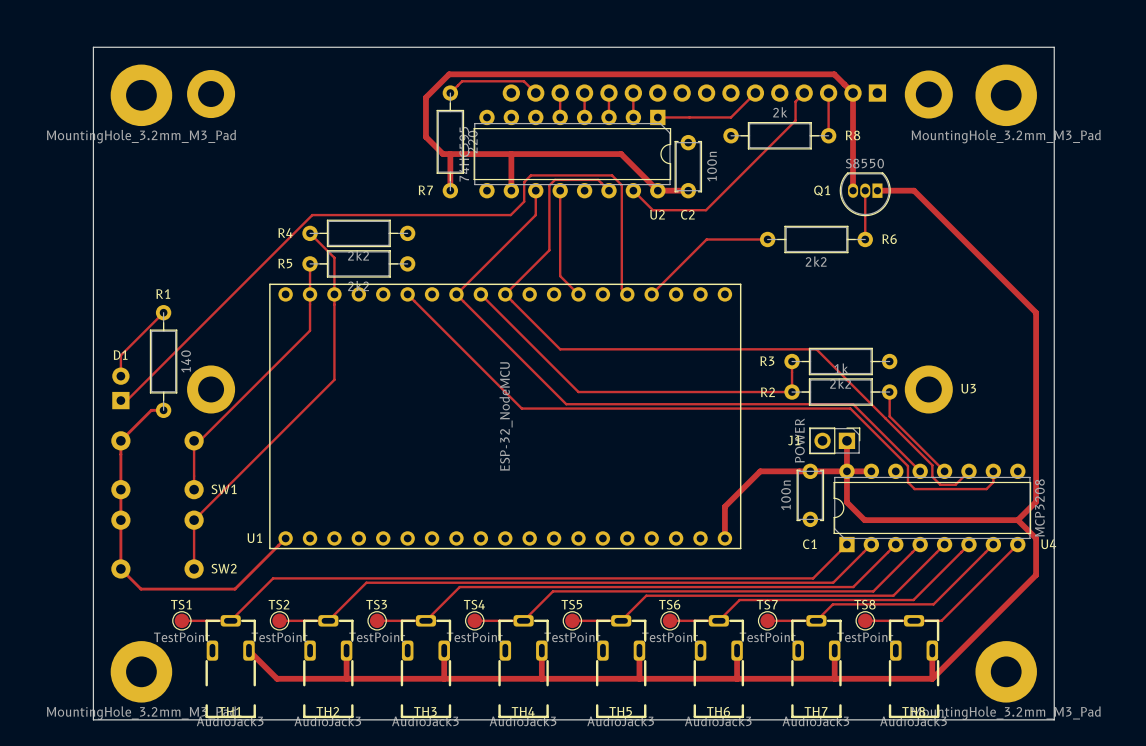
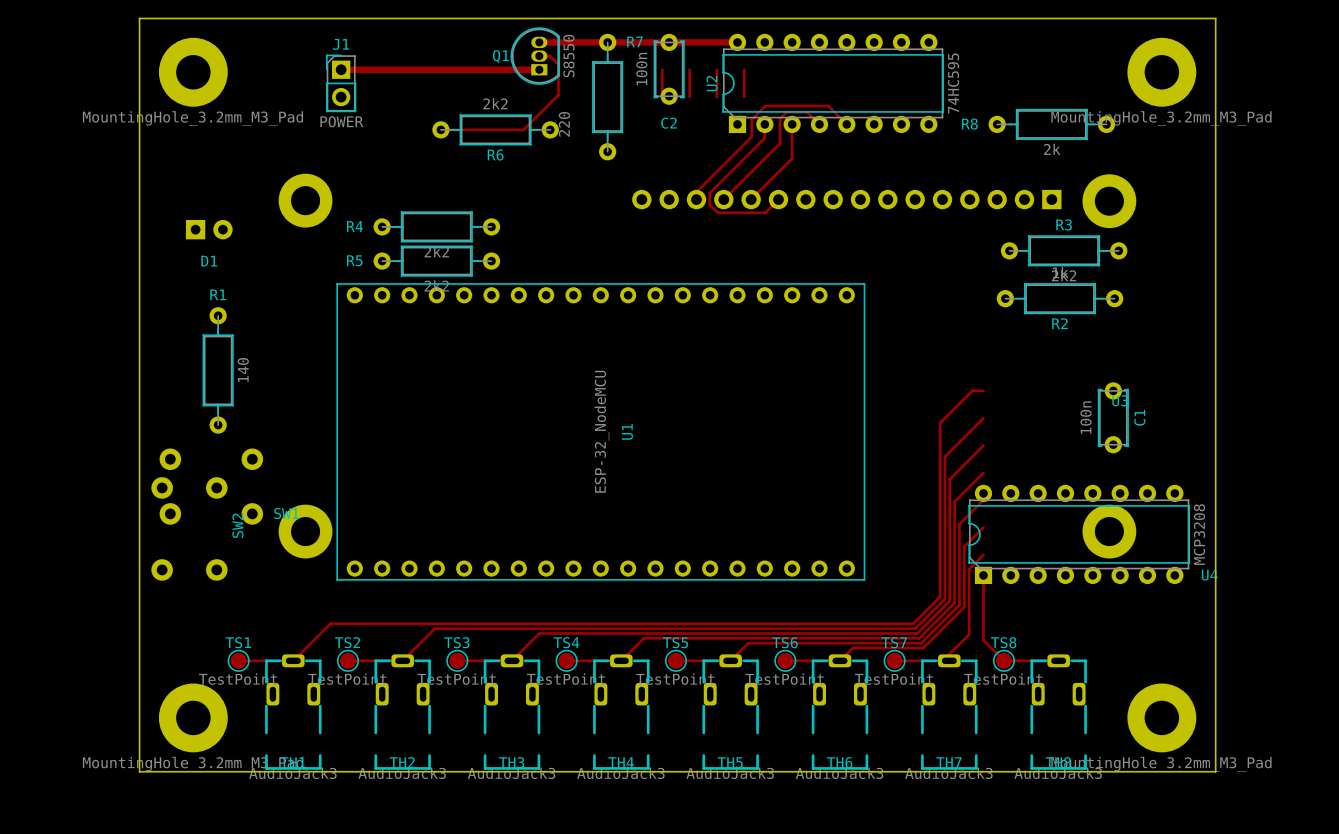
track: none -> (539, 42) (737, 42)
track: none -> (539, 56) (550, 56) (558, 64) (558, 95) (523, 129) (440, 129)
track: (450, 93) (462, 81) (523, 81) (535, 93) -> (539, 69) (341, 69)
track: (755, 93) (730, 117) (657, 117) -> none
track: (804, 93) (795, 101) (795, 120) (706, 210) (652, 210) (633, 190) -> none
track: (828, 93) (828, 135) -> none
R8 value position: 2k (780, 112) -> 2k (1052, 149)
R8 position: (779, 135) -> (1051, 124)
R8 name position: R8 (853, 135) -> R8 (969, 124)
R7 position: (450, 141) -> (607, 97)
track: none -> (764, 124) (764, 138) (709, 193) (709, 204) (717, 212) (765, 212) (778, 199)
track: none -> (792, 124) (792, 158) (751, 199)
track: none -> (819, 124) (807, 112) (786, 112) (780, 118) (780, 143) (723, 199)
track: none -> (846, 124) (828, 105) (765, 105) (751, 119) (751, 136) (696, 192) (696, 199)
track: (450, 154) (450, 190) -> none
track: (511, 154) (511, 190) -> none
U2 rotation: 0° (572, 154) -> 180° (833, 83)
U2 position: (572, 154) -> (833, 83)
C2 position: (688, 166) -> (669, 69)
C2 value position: 100n (712, 166) -> 100n (641, 69)
R7 name position: R7 (425, 190) -> R7 (634, 42)
track: (535, 190) (535, 215) (456, 294) (566, 404) (853, 404) (920, 471) -> none
track: (560, 190) (560, 276) (578, 294) -> none
track: (608, 190) (598, 179) (555, 179) (549, 185) (549, 250) (505, 294) (560, 349) (816, 349) (932, 465) (932, 476) (940, 484) (955, 484) (968, 471) -> none
track: (688, 190) (657, 190) (621, 154) (443, 154) (425, 136) (425, 97) (449, 74) (834, 74) (853, 93) (853, 190) -> none
track: (865, 190) (865, 239) -> none
track: (877, 190) (914, 190) (1036, 312) (1036, 501) (1017, 520) -> none
Q1 rotation: 0° (865, 194) -> 90° clockwise (535, 56)
Q1 position: (865, 194) -> (535, 56)
U2 name position: U2 (657, 214) -> U2 (712, 83)
track: (310, 233) (334, 257) (334, 379) (194, 520) (194, 568) -> none
track: (767, 239) (706, 239) (651, 294) -> none
R6 position: (816, 239) -> (495, 129)
R6 name position: R6 (889, 239) -> R6 (495, 154)
U3 position: (569, 241) -> (707, 366)
R6 value position: 2k2 (816, 261) -> 2k2 (495, 103)
track: (310, 263) (310, 330) (199, 440) (194, 440) (194, 489) -> none
track: (407, 294) (521, 408) (850, 408) (907, 466) (907, 482) (914, 489) (986, 489) (993, 482) (993, 471) -> none
track: (480, 294) (578, 392) (792, 392) (792, 361) -> none
track: (627, 294) (621, 288) (621, 185) (612, 175) (530, 175) (524, 182) (524, 201) (510, 215) (312, 215) (126, 400) (120, 400) -> none
track: (163, 312) (120, 355) (120, 376) -> none
D1 name position: D1 (120, 355) -> D1 (209, 261)
R3 name position: R3 (767, 361) -> R3 (1064, 224)
R3 position: (840, 361) -> (1064, 250)
D1 rotation: 0° (120, 388) -> 90° clockwise (209, 229)
D1 position: (120, 388) -> (209, 229)
R2 name position: R2 (767, 392) -> R2 (1059, 323)
R2 position: (840, 392) -> (1060, 298)
track: (889, 392) (889, 416) (944, 471) -> none
track: (163, 410) (151, 410) (120, 440) (120, 568) (141, 589) (234, 589) (285, 538) -> none
J1 name position: J1 (794, 440) -> J1 (341, 44)
J1 rotation: 0° (834, 440) -> 90° counterclockwise (341, 83)
J1 position: (834, 440) -> (341, 83)
track: (846, 440) (846, 502) (864, 520) (1017, 520) -> none
track: (871, 471) (760, 471) (724, 506) (724, 538) -> none
C1 position: (810, 495) -> (1113, 417)
track: (1017, 520) (1036, 538) (1036, 575) (932, 678) -> none
U1 name rotation: 0° (254, 538) -> 90° counterclockwise (627, 431)
U1 name position: U1 (254, 538) -> U1 (627, 431)
SW2 rotation: 0° (157, 544) -> 90° clockwise (189, 528)
C1 name rotation: 0° (809, 544) -> 90° counterclockwise (1139, 417)
C1 name position: C1 (809, 544) -> C1 (1139, 417)
track: (846, 544) (813, 578) (273, 578) (263, 587) -> (983, 390) (972, 390) (940, 423) (940, 596) (913, 623) (330, 623)
track: (871, 544) (833, 582) (366, 582) (357, 592) -> (983, 418) (944, 456) (944, 598) (915, 628) (434, 628)
track: (895, 544) (853, 587) (459, 587) (450, 596) -> (983, 445) (949, 479) (949, 600) (917, 633) (539, 633)
track: (920, 544) (873, 591) (553, 591) (543, 600) -> (983, 472) (954, 501) (954, 602) (919, 638) (643, 638)
track: (944, 544) (893, 595) (646, 595) (636, 605) -> (983, 500) (959, 524) (959, 604) (921, 643) (748, 643)
track: (968, 544) (913, 600) (739, 600) (730, 609) -> (983, 527) (964, 546) (964, 606) (923, 648) (852, 648)
track: (993, 544) (933, 604) (832, 604) (816, 620) -> (983, 554) (969, 569) (969, 634) (949, 654) (949, 660)
track: (1017, 544) (941, 620) (914, 620) -> none
track: none -> (983, 582) (983, 640) (1003, 660)
SW2 name position: SW2 (224, 568) -> SW2 (237, 525)
track: (248, 650) (277, 678) (932, 678) -> none
track: (346, 650) (346, 678) -> none
track: (444, 650) (444, 678) -> none
track: (541, 650) (541, 678) -> none
track: (639, 650) (639, 678) -> none
track: (737, 650) (737, 678) -> none
track: (834, 650) (834, 678) -> none
track: (932, 650) (932, 678) -> none

